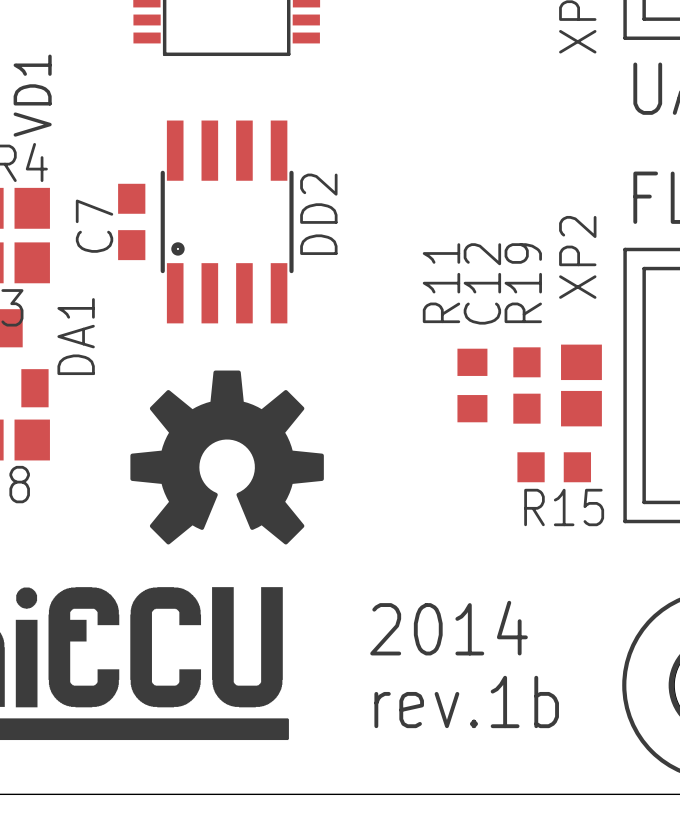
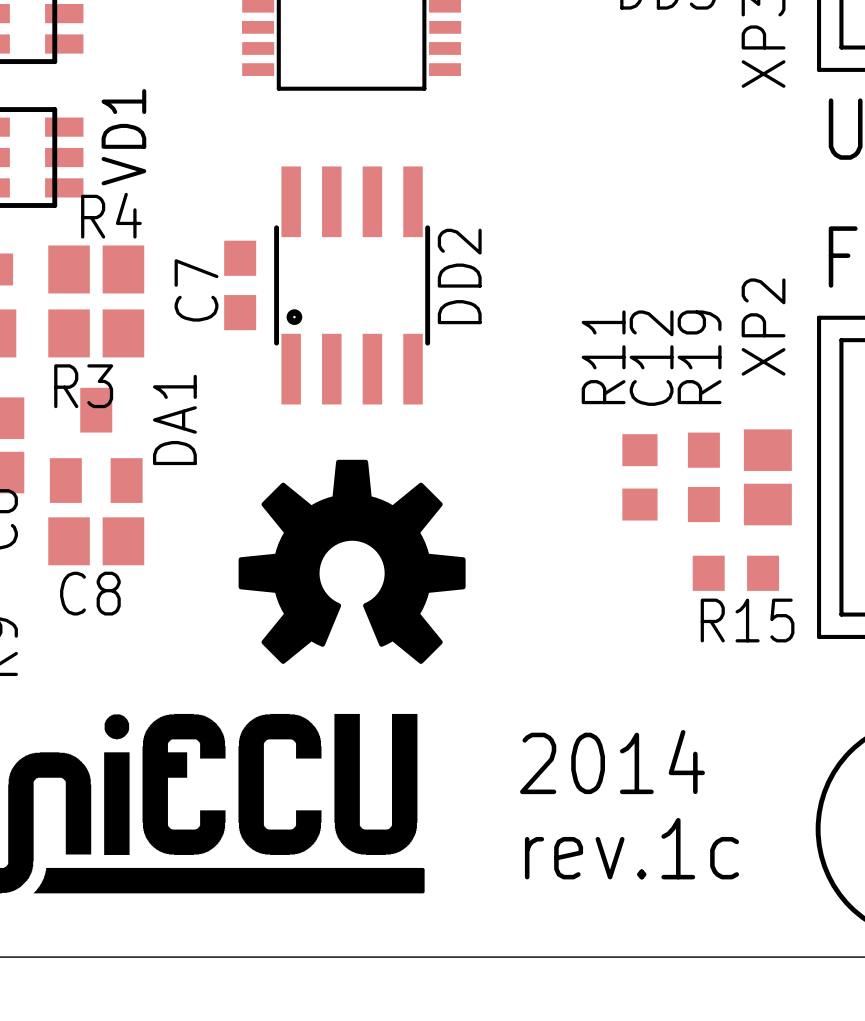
text: rev.1b (466, 701) -> rev.1c (631, 848)

